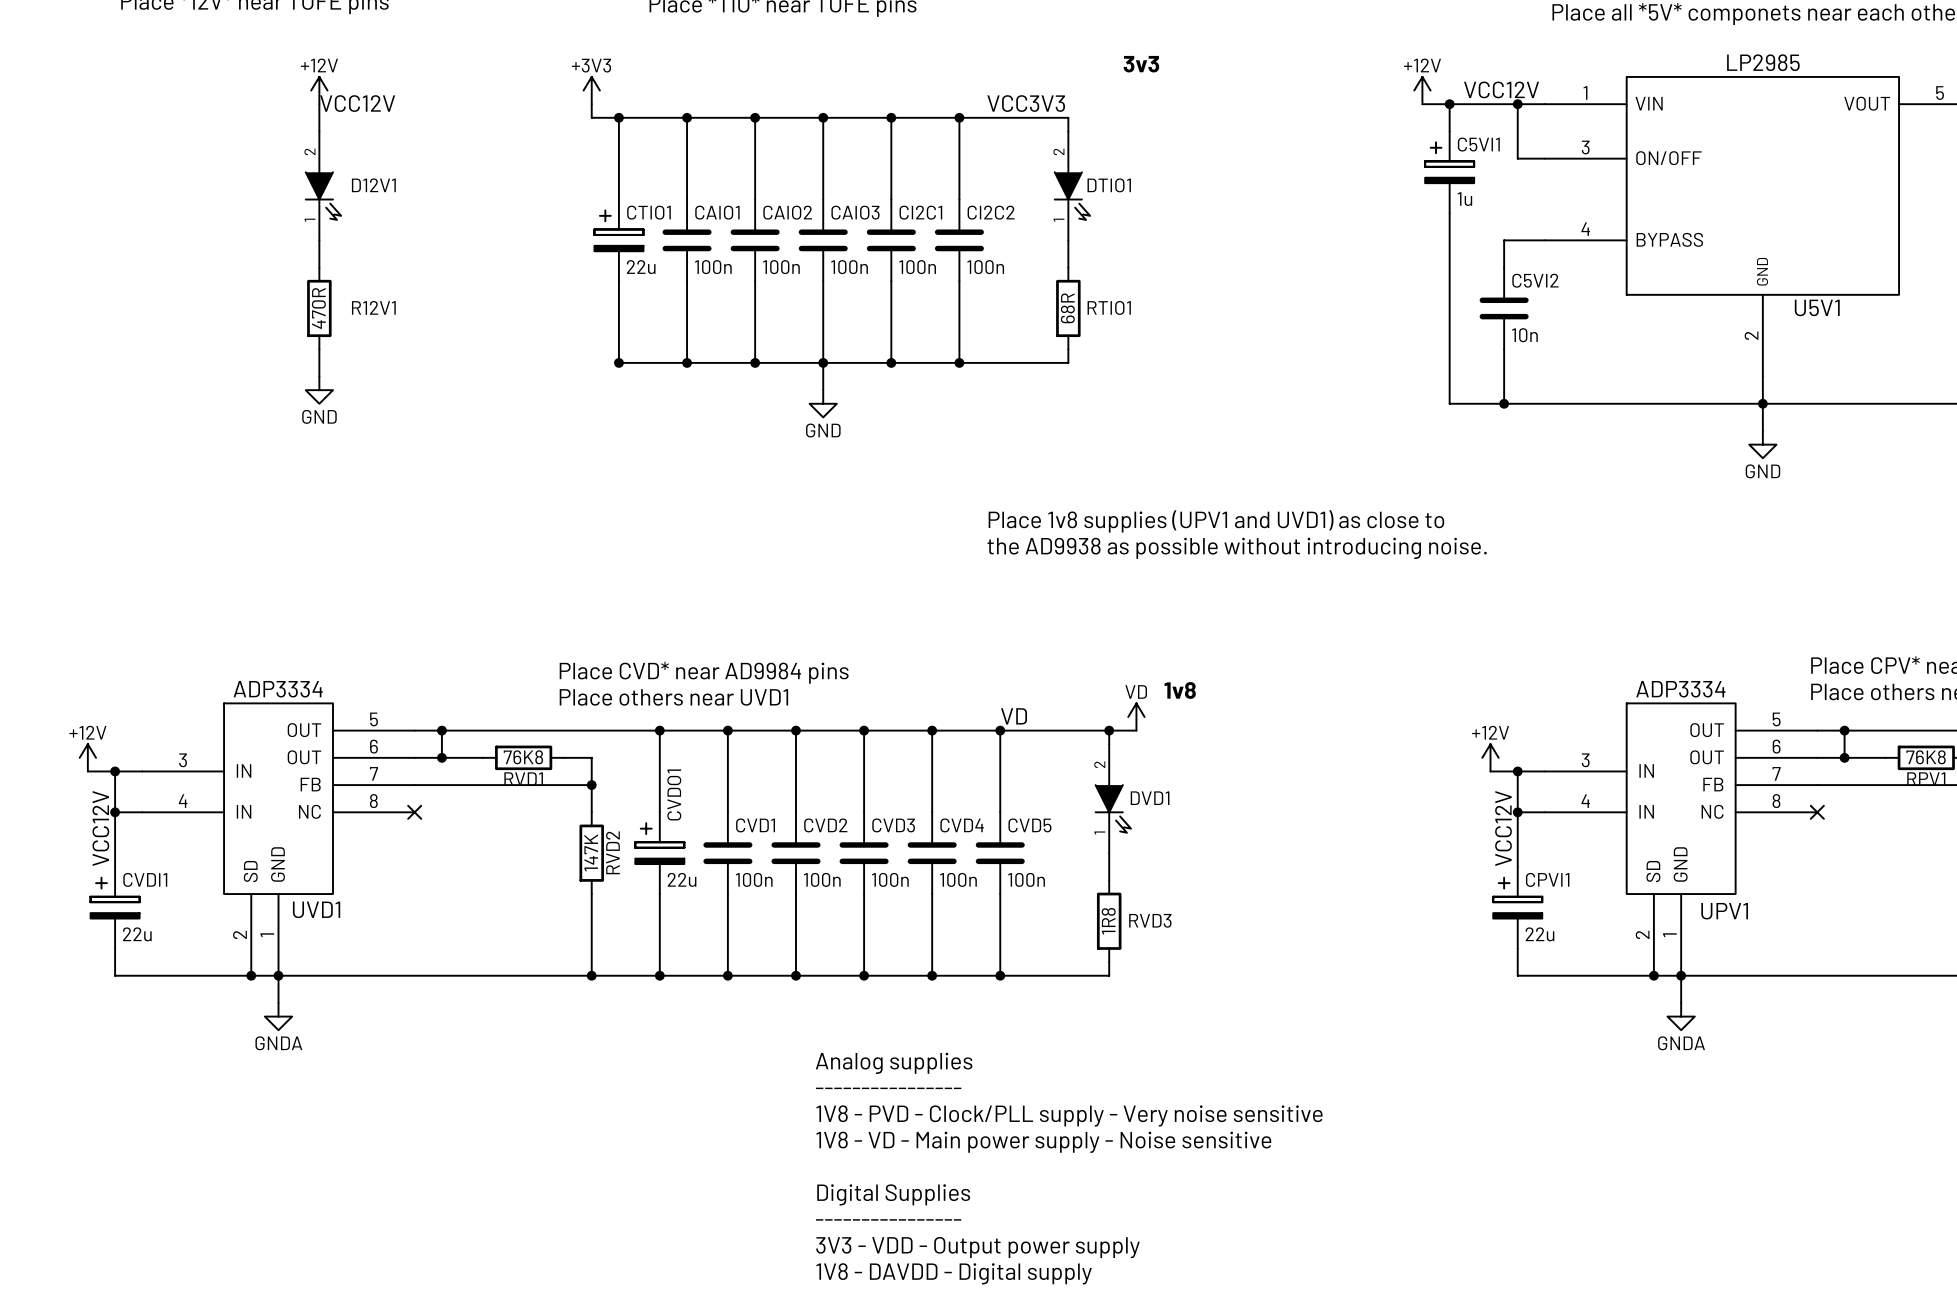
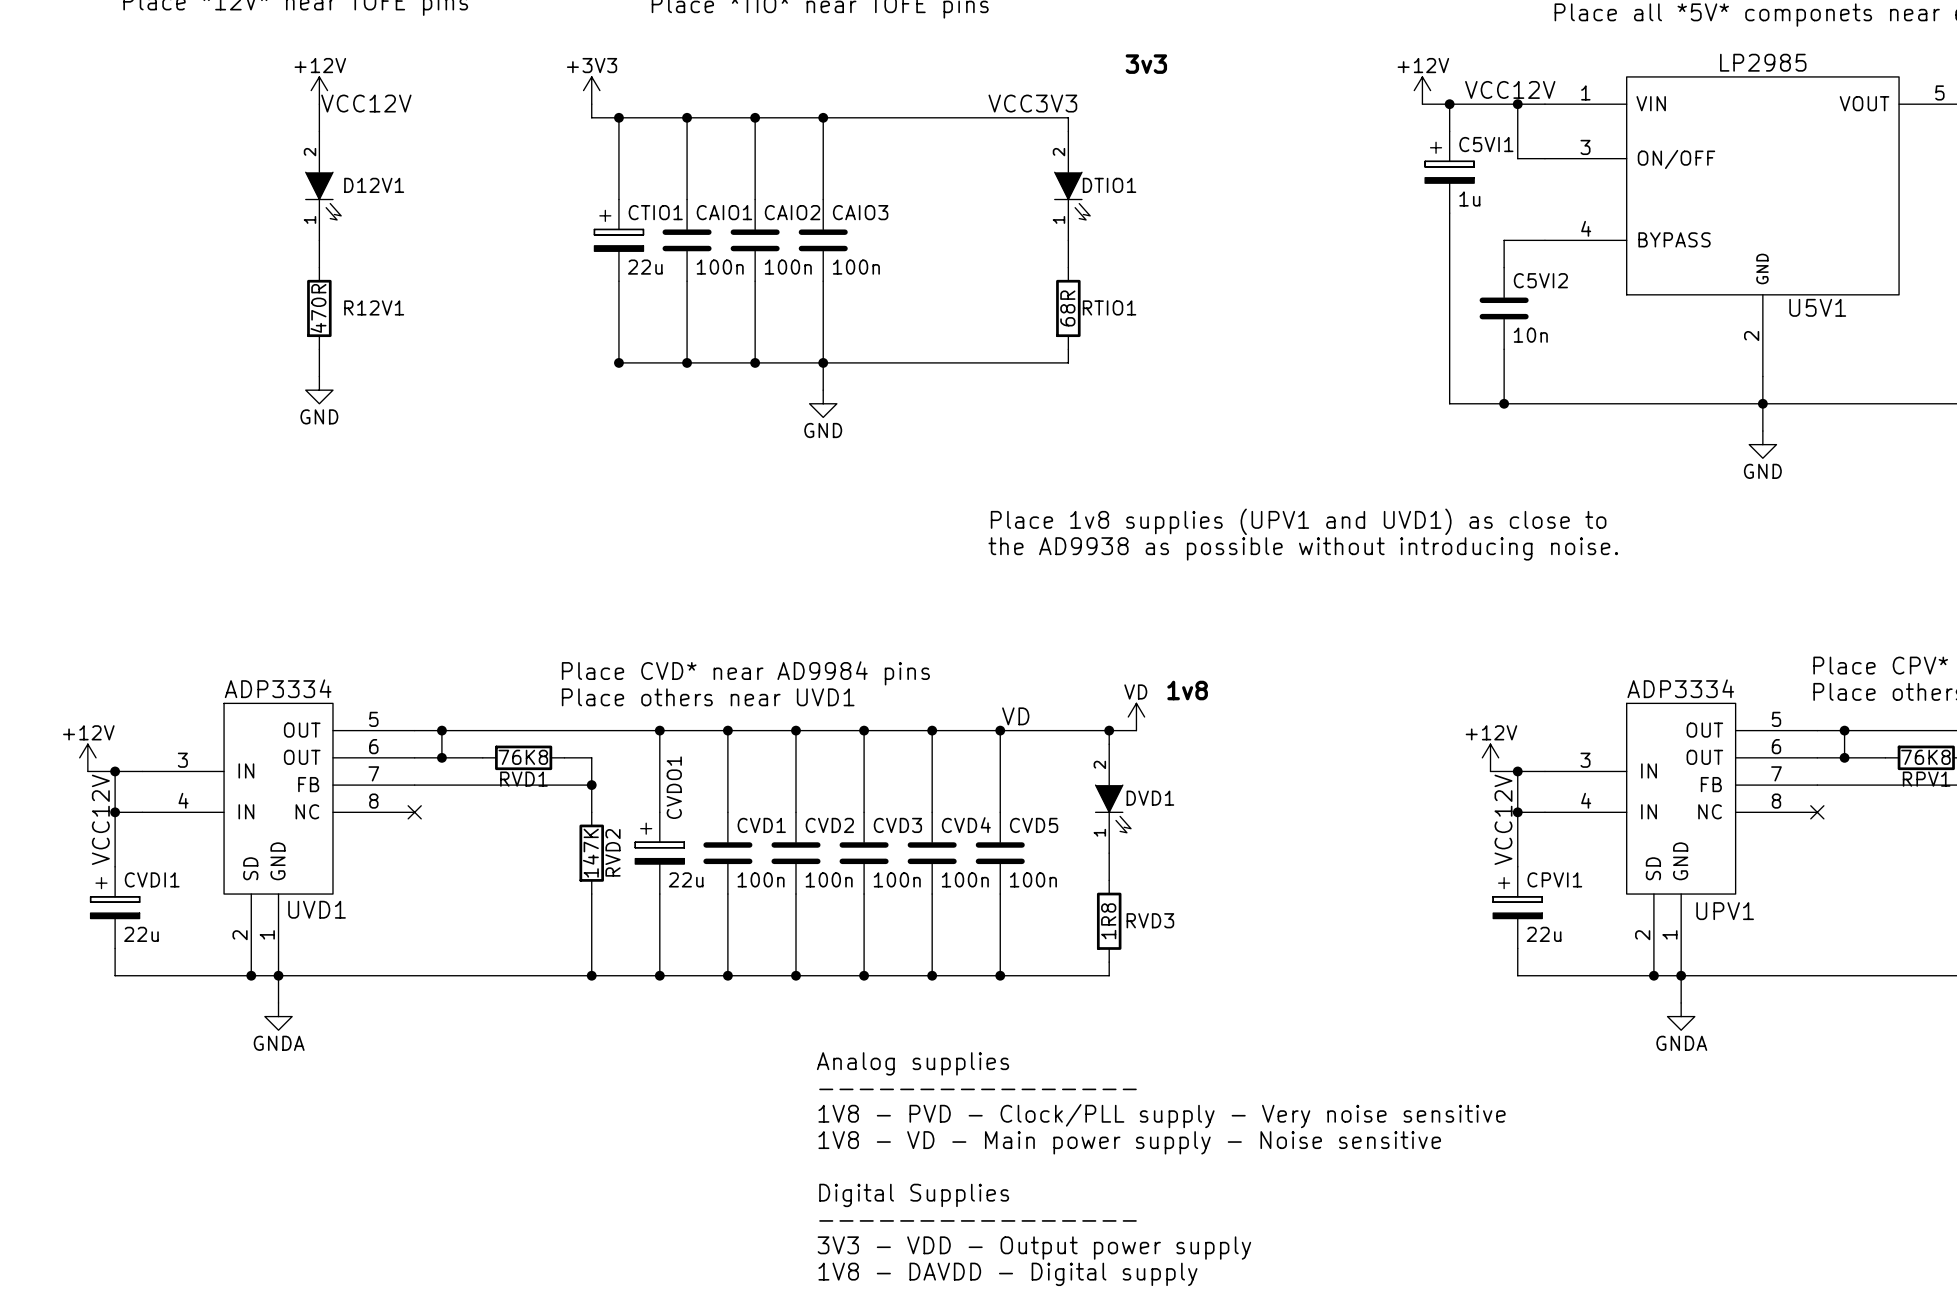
wire: (891, 117) (891, 199) -> none
junction: (891, 117) -> none
wire: (959, 117) (959, 199) -> none
junction: (959, 117) -> none
CI2C1: 100n (891, 240) -> none
CI2C2: 100n (959, 240) -> none
wire: (891, 281) (891, 362) -> none
wire: (959, 281) (959, 362) -> none
junction: (891, 362) -> none
junction: (959, 362) -> none

